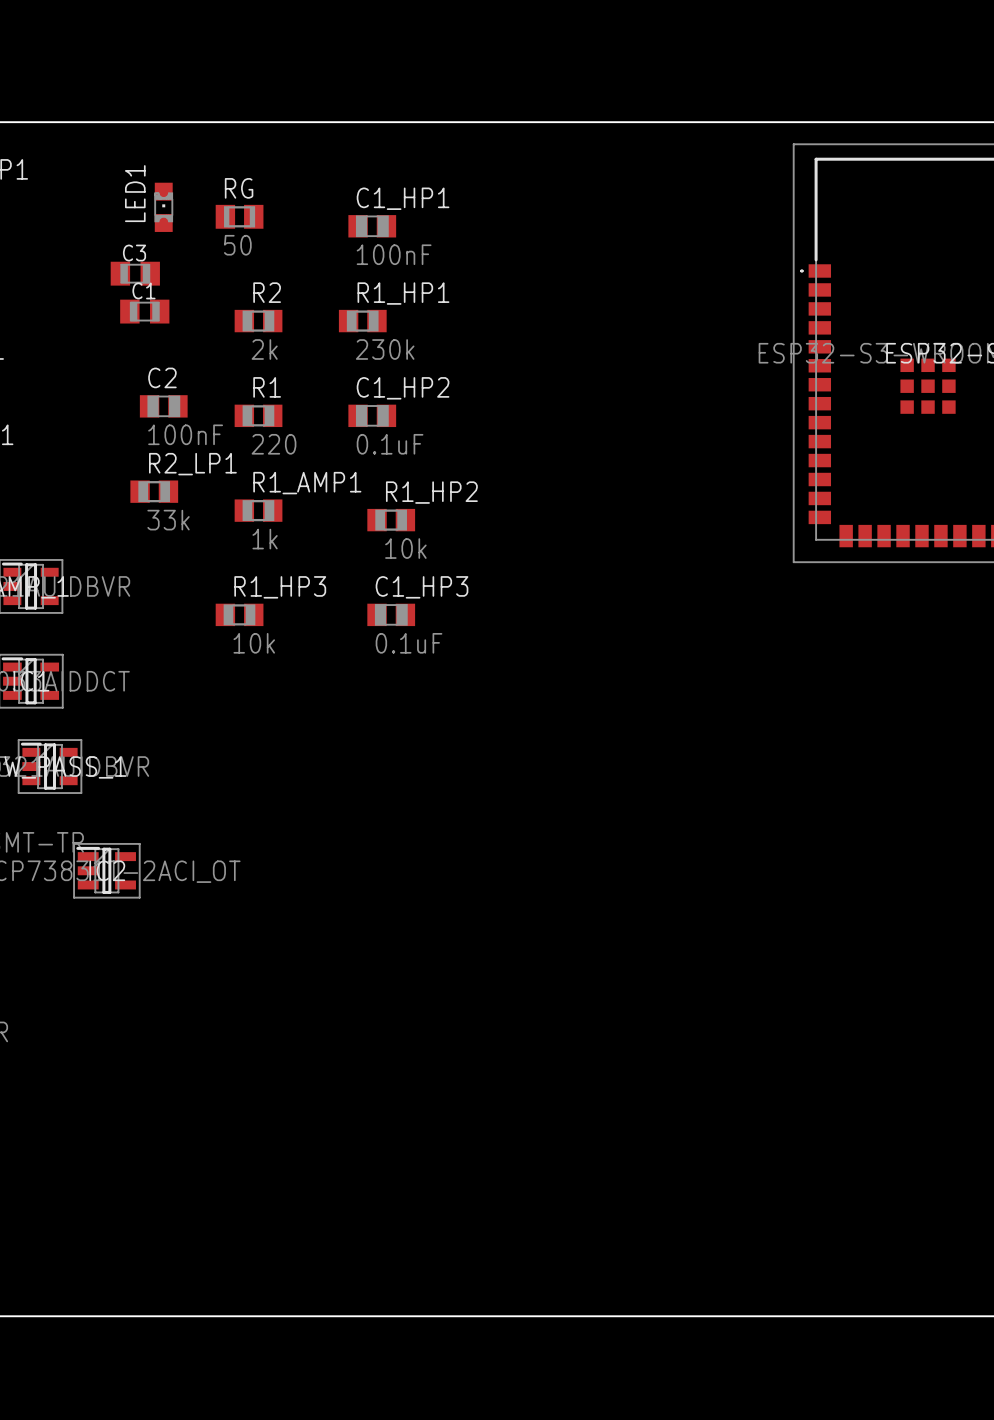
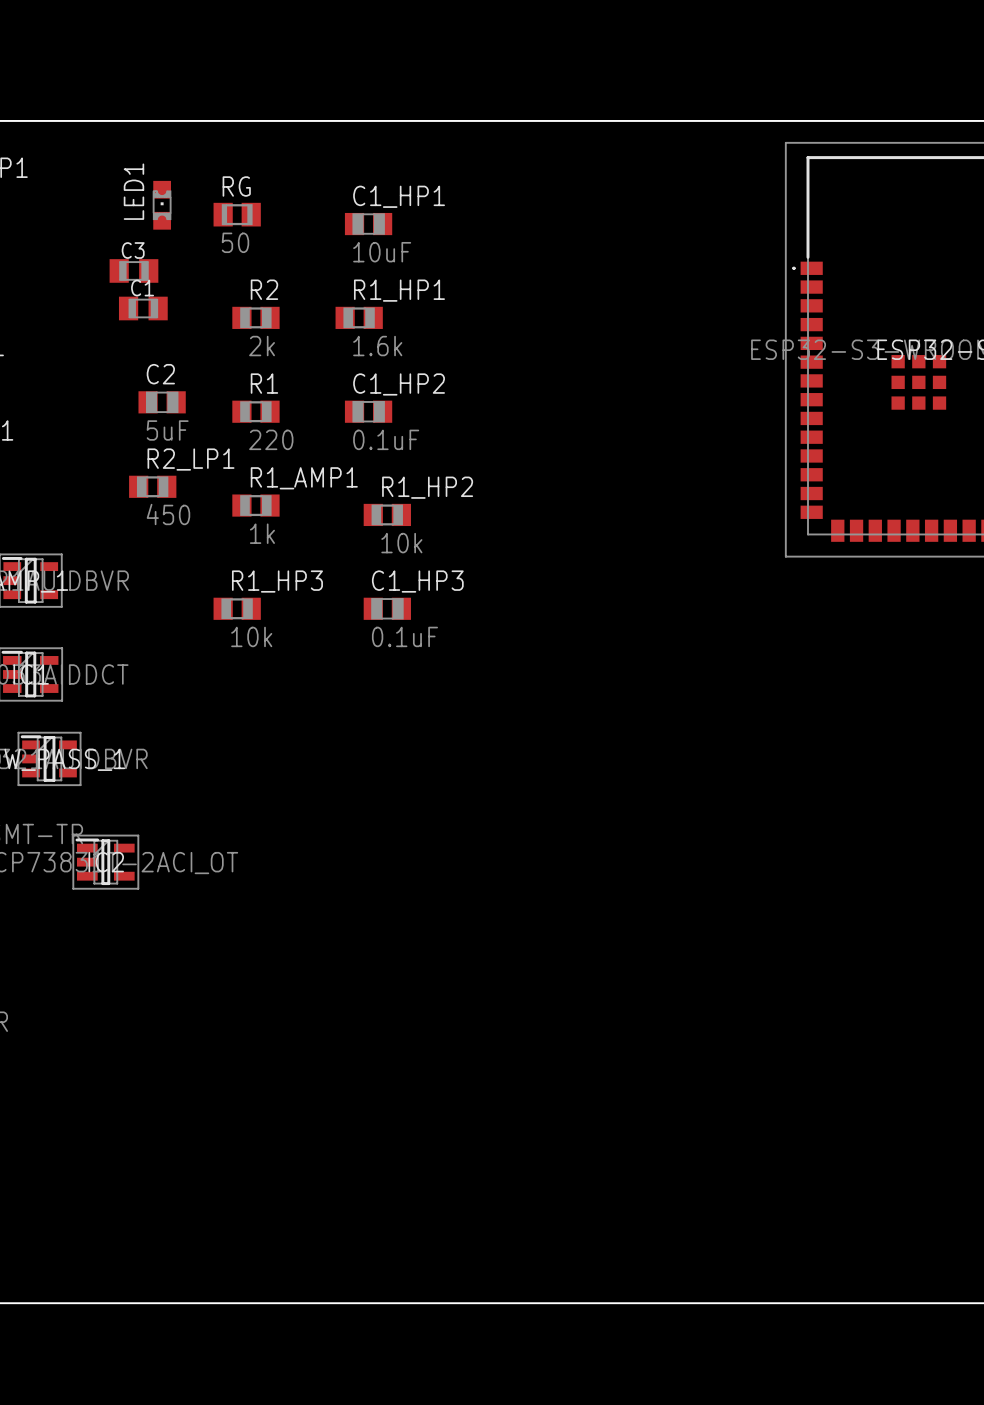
C1_HP1 value: 100nF (394, 254) -> 10uF (382, 252)
R1_HP1 value: 230k (385, 349) -> 1.6k (377, 346)
C2 value: 100nF (185, 434) -> 5uF (167, 430)
R2_LP1 value: 33k (168, 520) -> 450 (168, 514)

